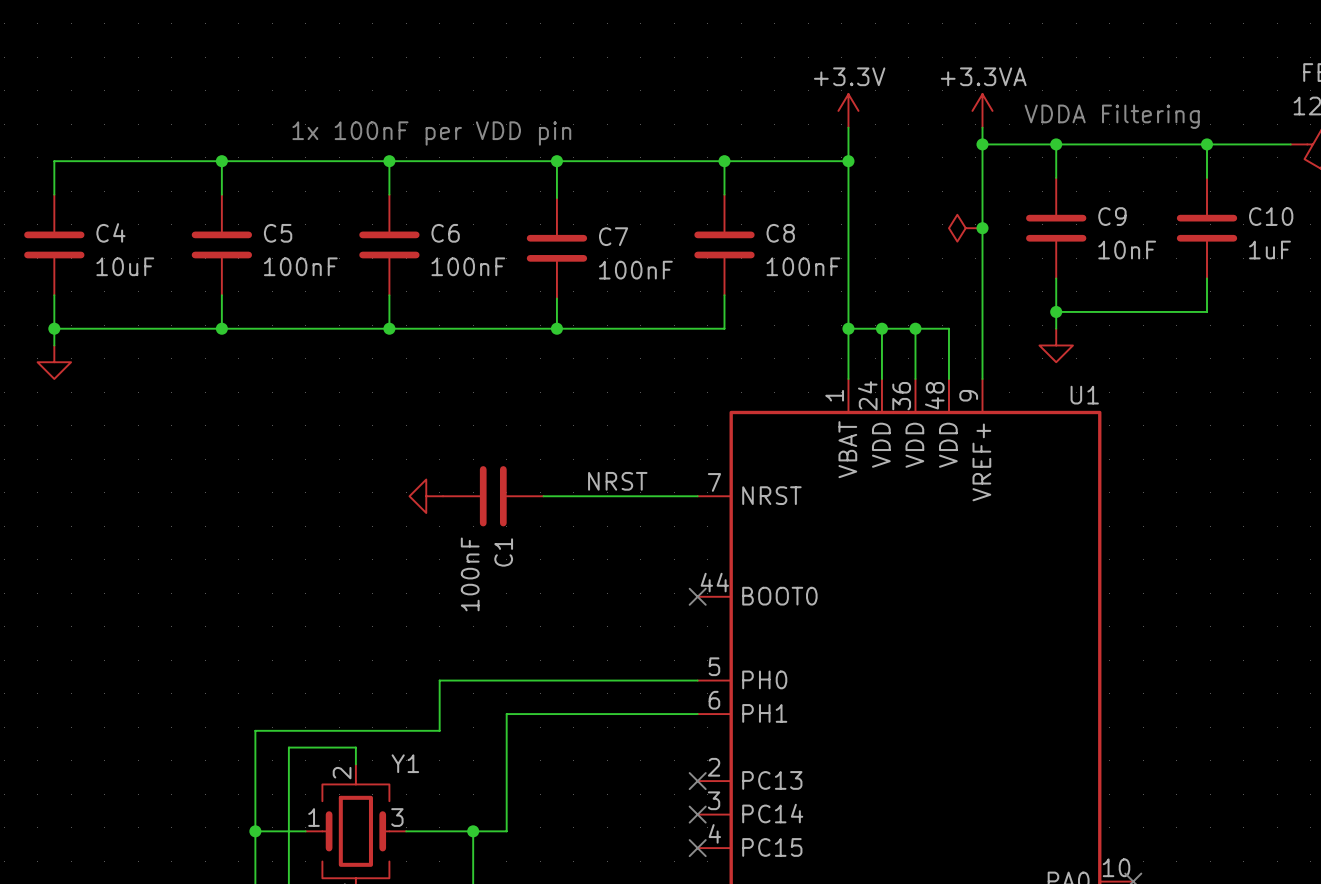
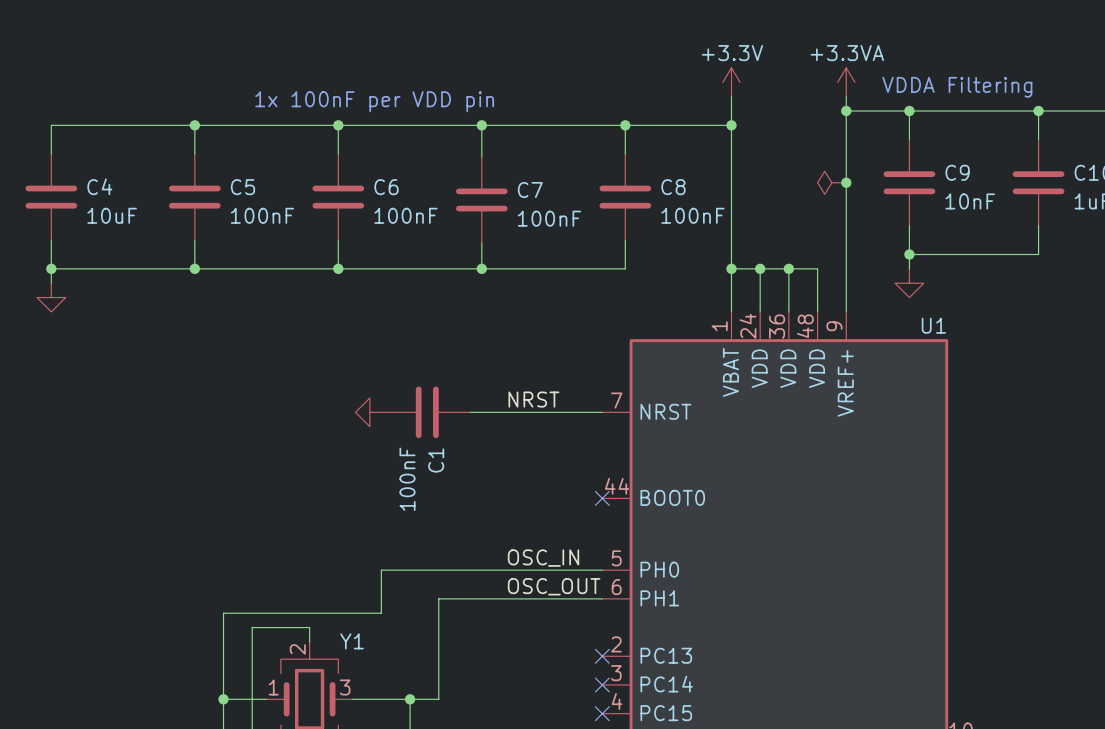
label: none -> OSC_IN (543, 558)
label: none -> OSC_OUT (554, 586)

